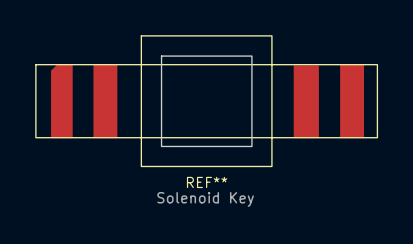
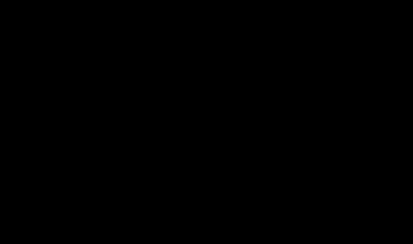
REF**: Solenoid Key (206, 101) -> none

